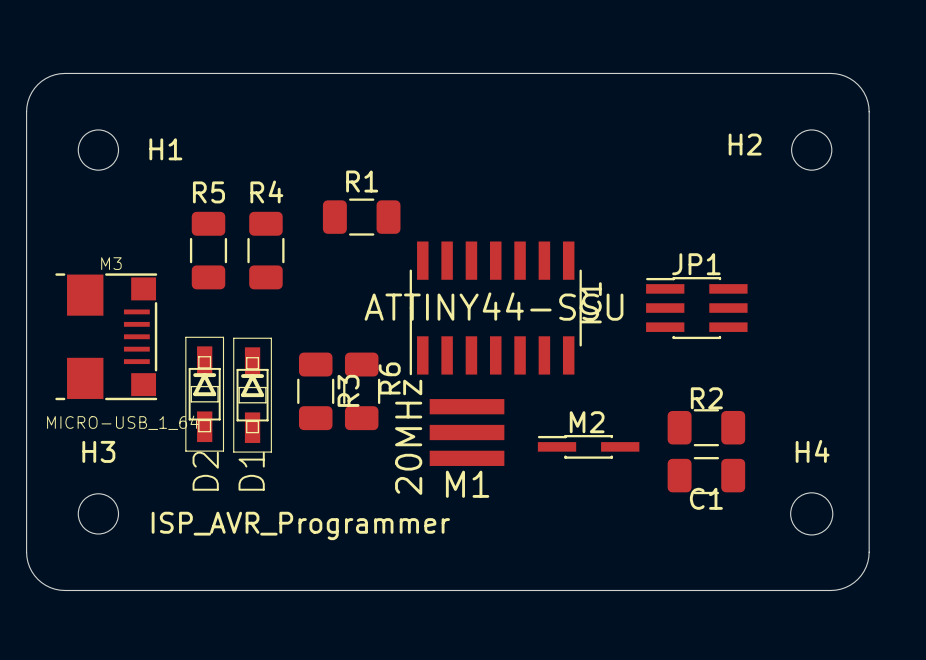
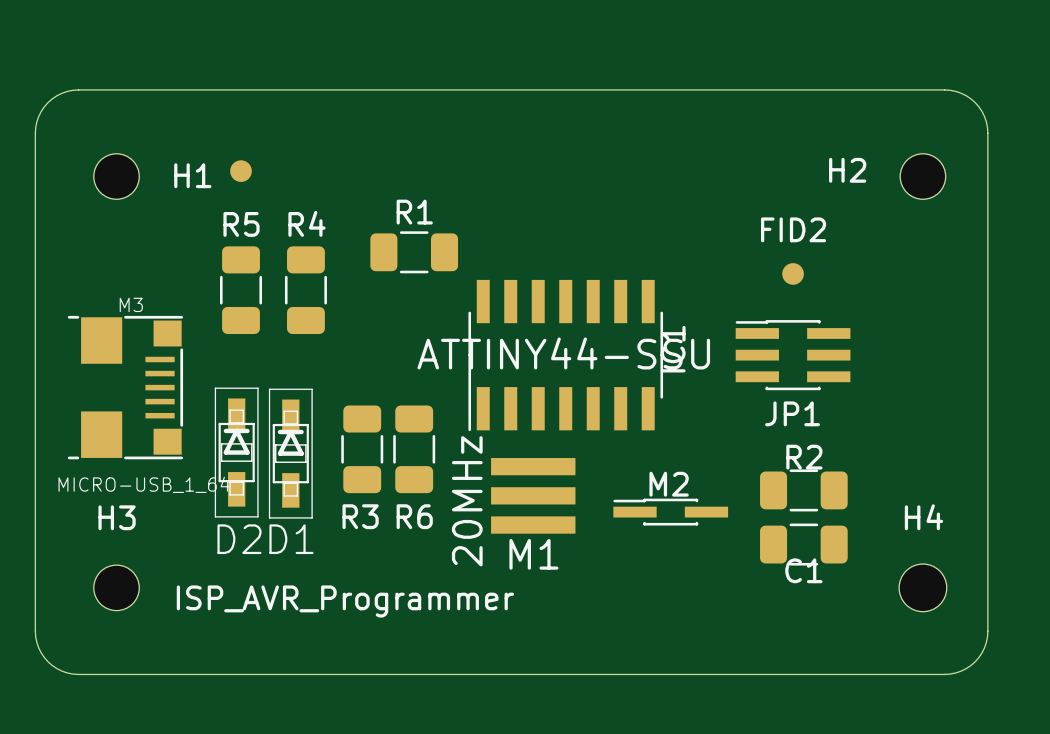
part: none -> (241, 171)
FID2: none -> (793, 273)
JP1 name position: JP1 (696, 264) -> JP1 (792, 413)
R6 name rotation: 0° (389, 378) -> 90° clockwise (414, 516)
R6 name position: R6 (389, 378) -> R6 (414, 516)
R3 name rotation: 0° (348, 390) -> 90° clockwise (360, 516)
R3 name position: R3 (348, 390) -> R3 (360, 516)
D2 name rotation: 0° (205, 471) -> 90° clockwise (239, 539)
D1 name rotation: 0° (251, 471) -> 90° clockwise (291, 539)

